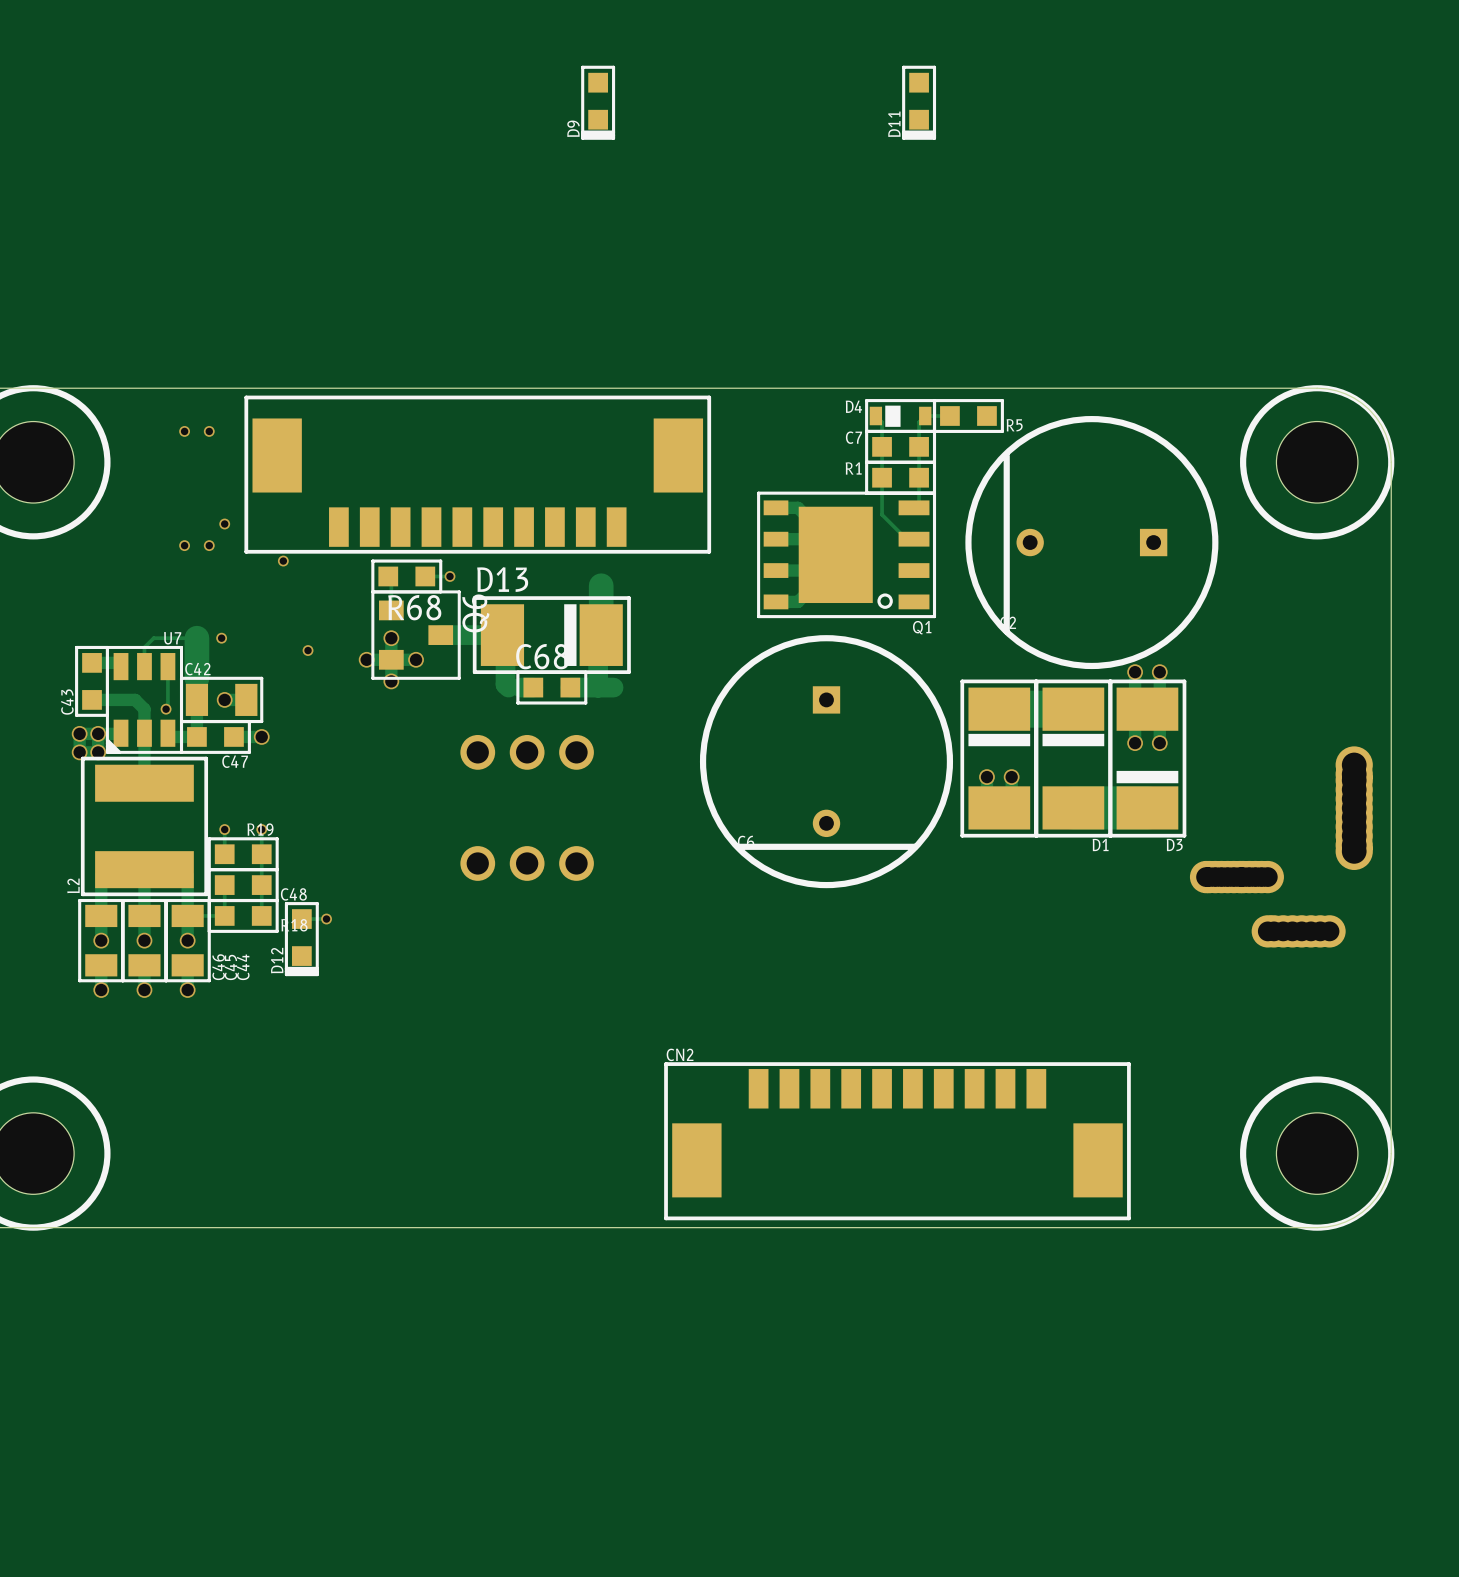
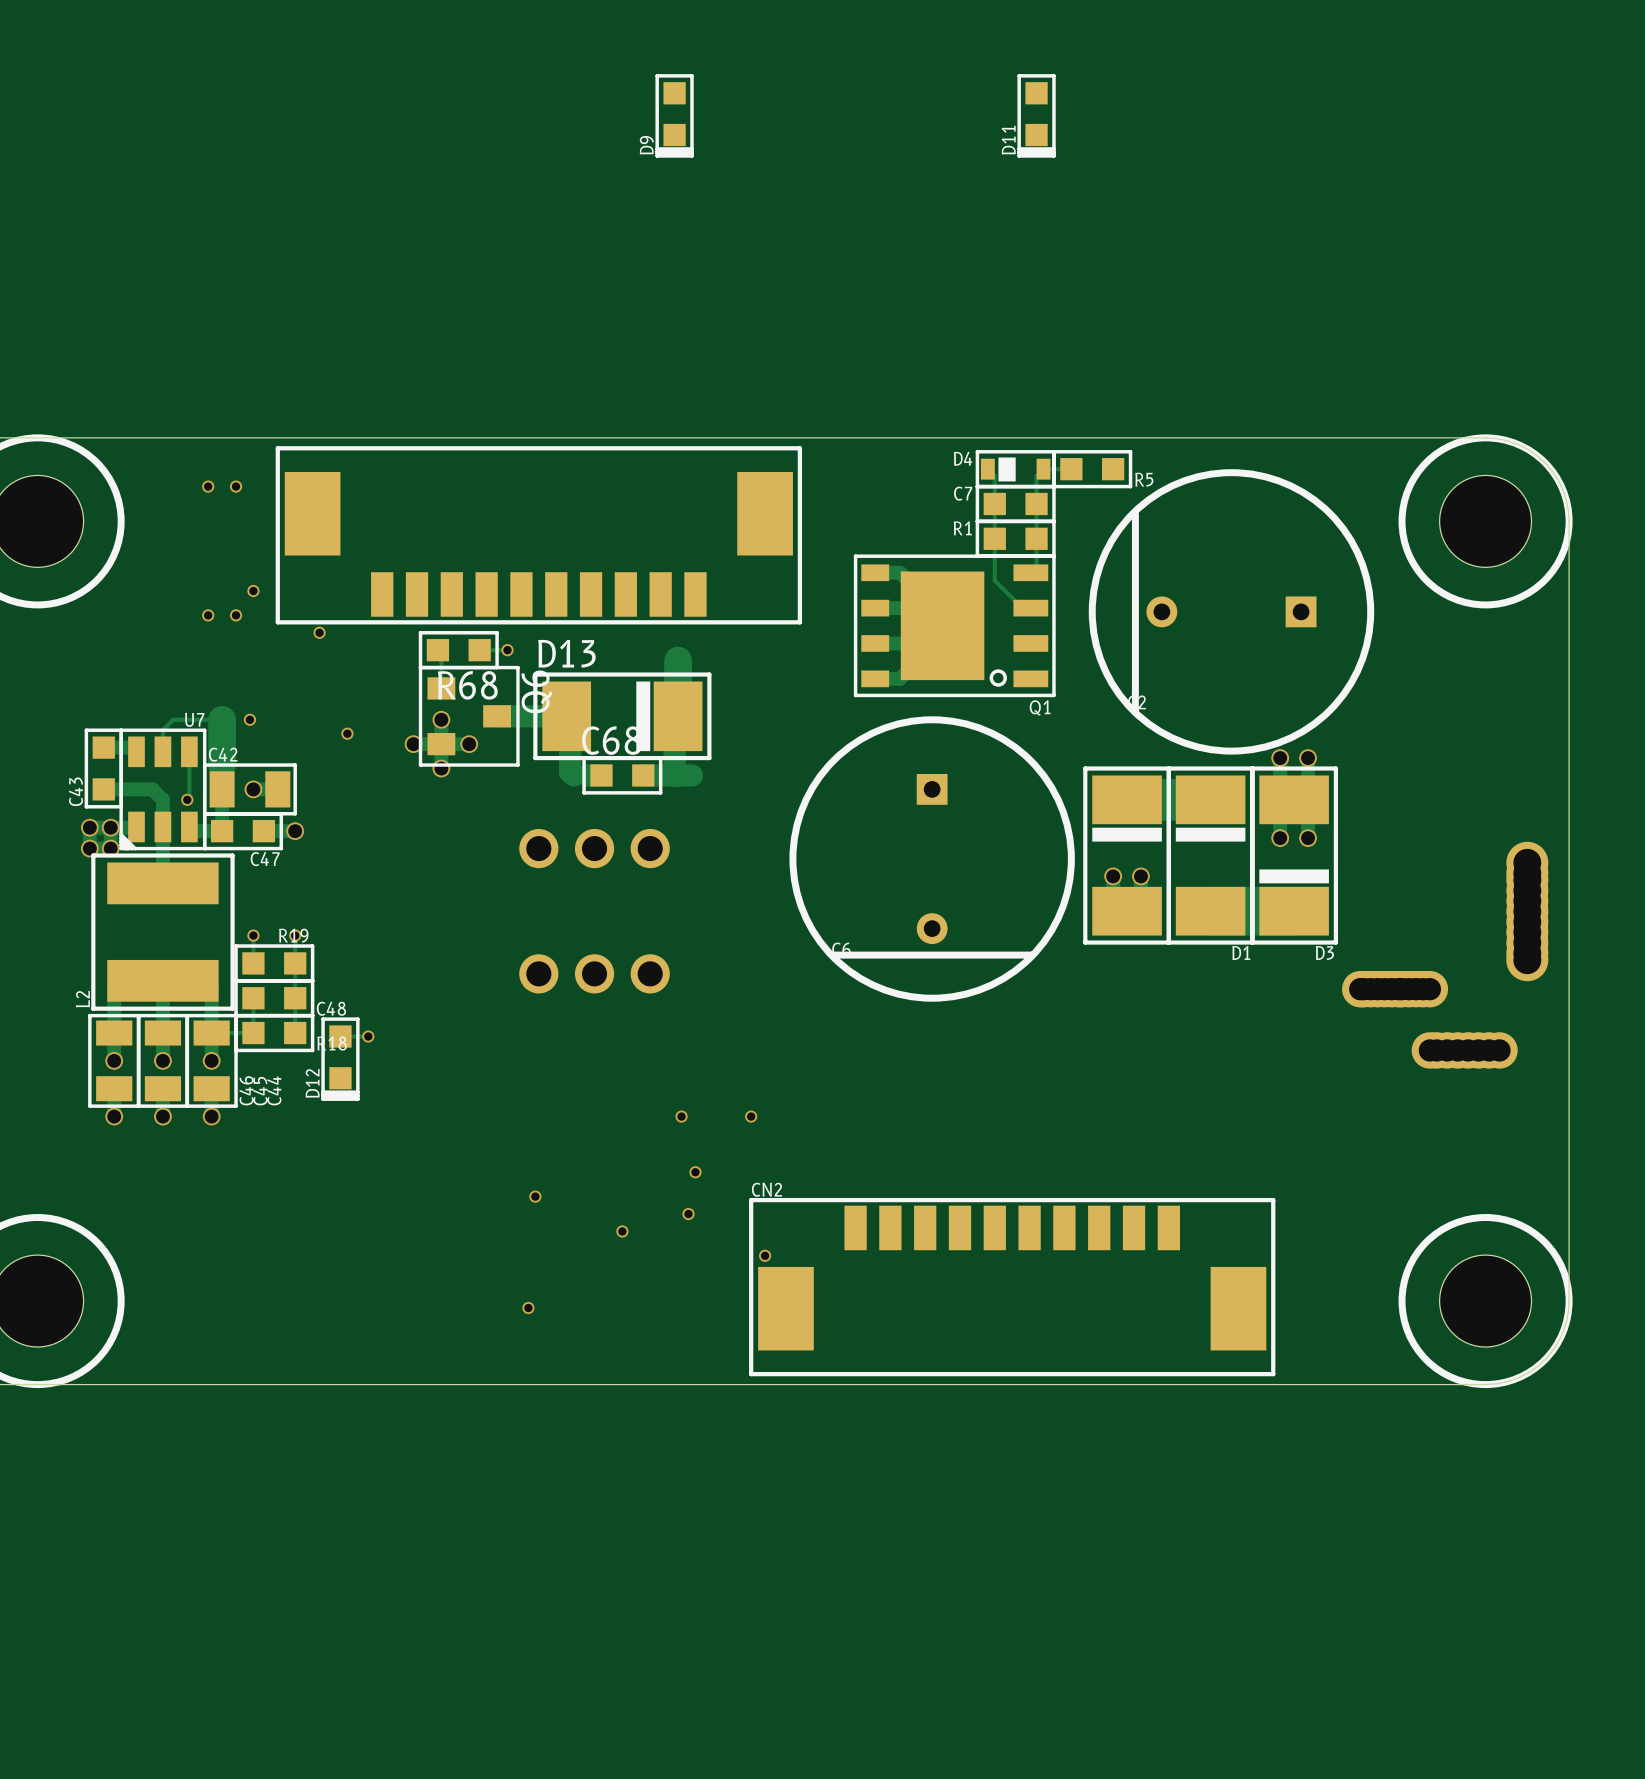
via: none -> (681, 1116)
via: none -> (751, 1116)
via: none -> (695, 1172)
via: none -> (535, 1196)
via: none -> (688, 1214)
via: none -> (622, 1231)
via: none -> (765, 1255)
via: none -> (528, 1308)

